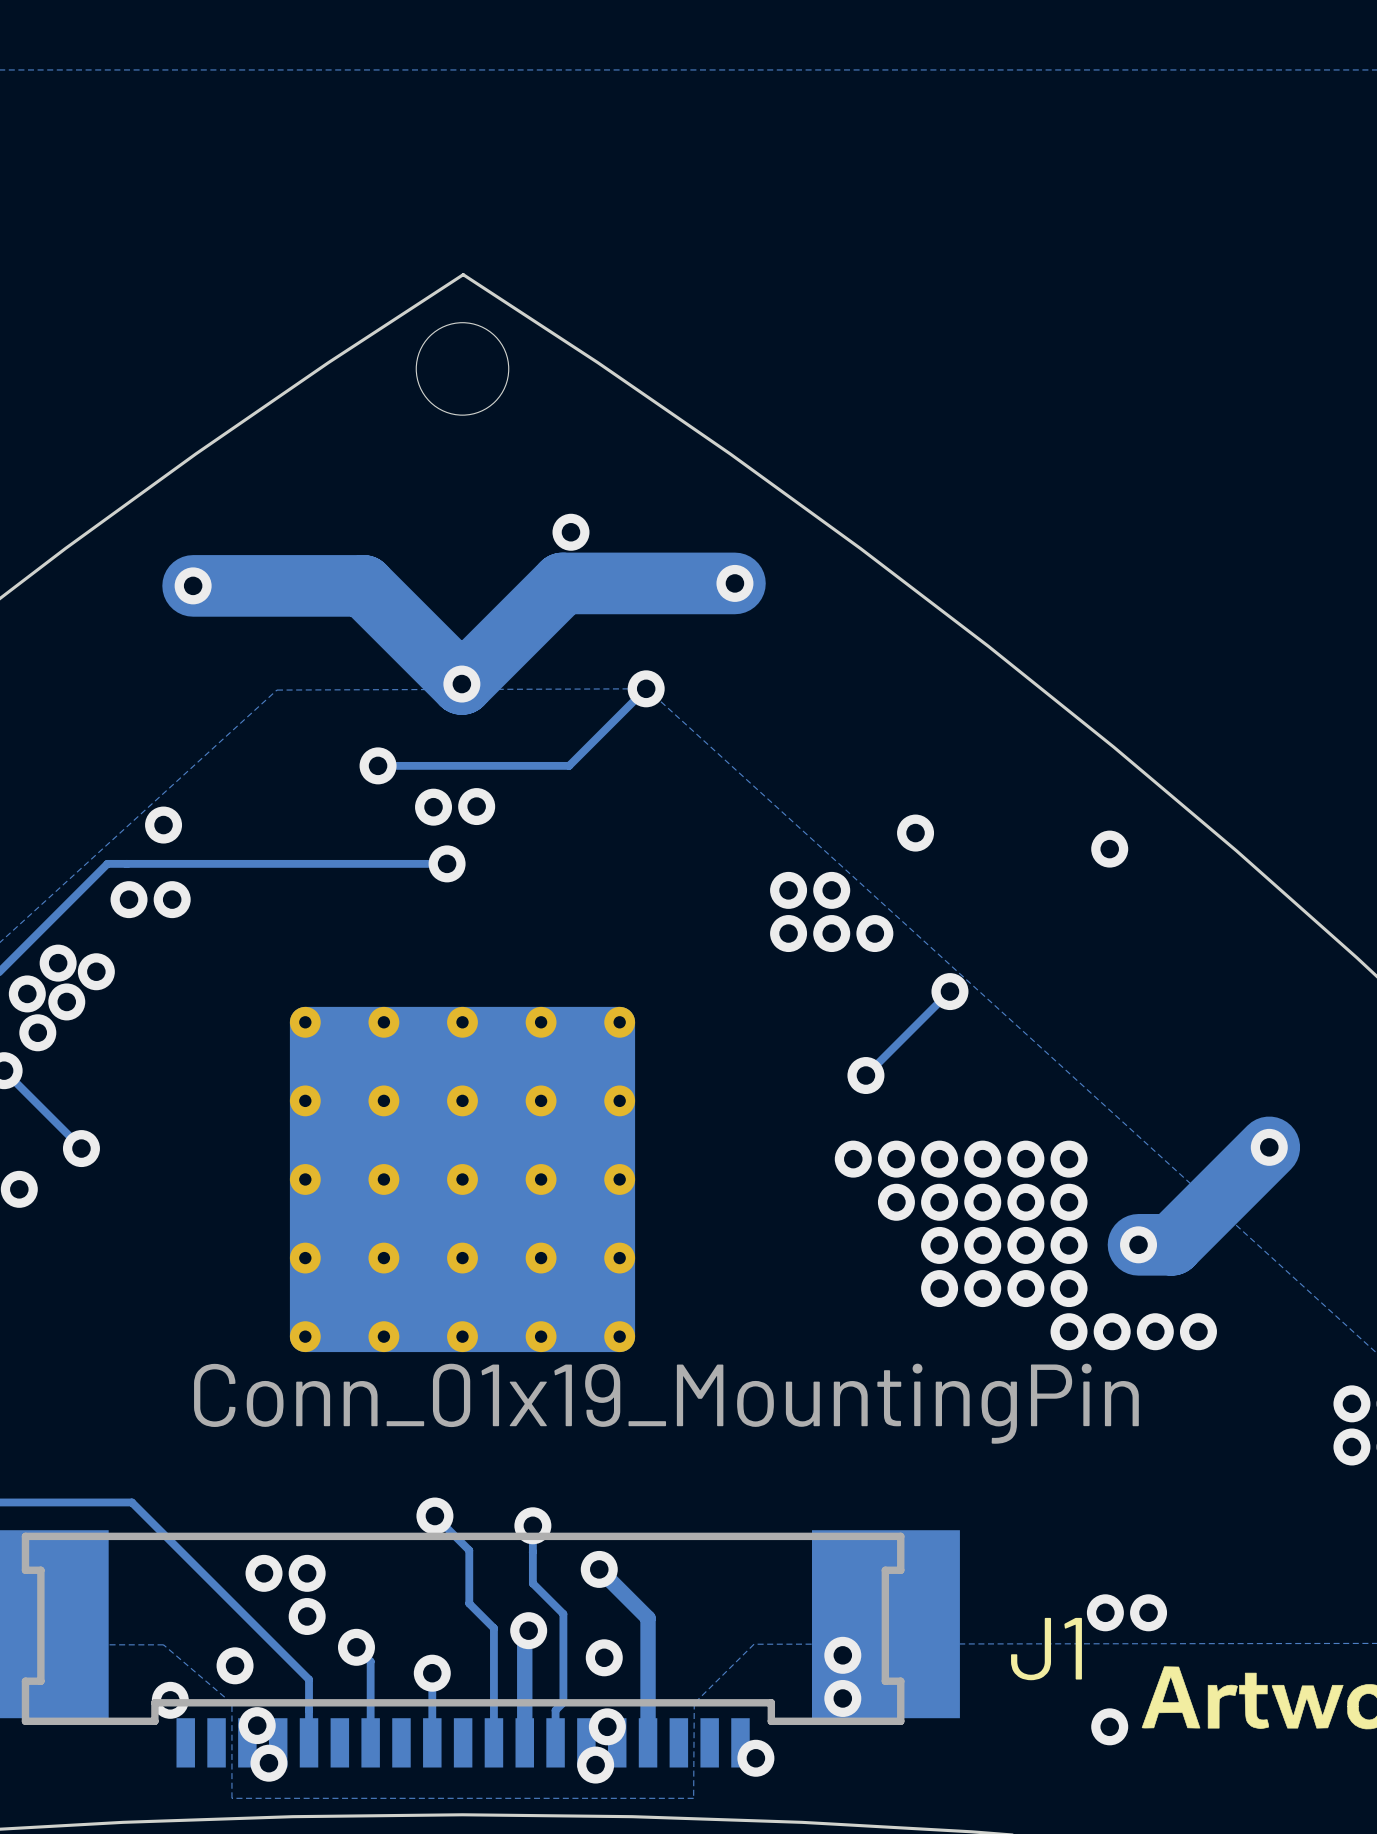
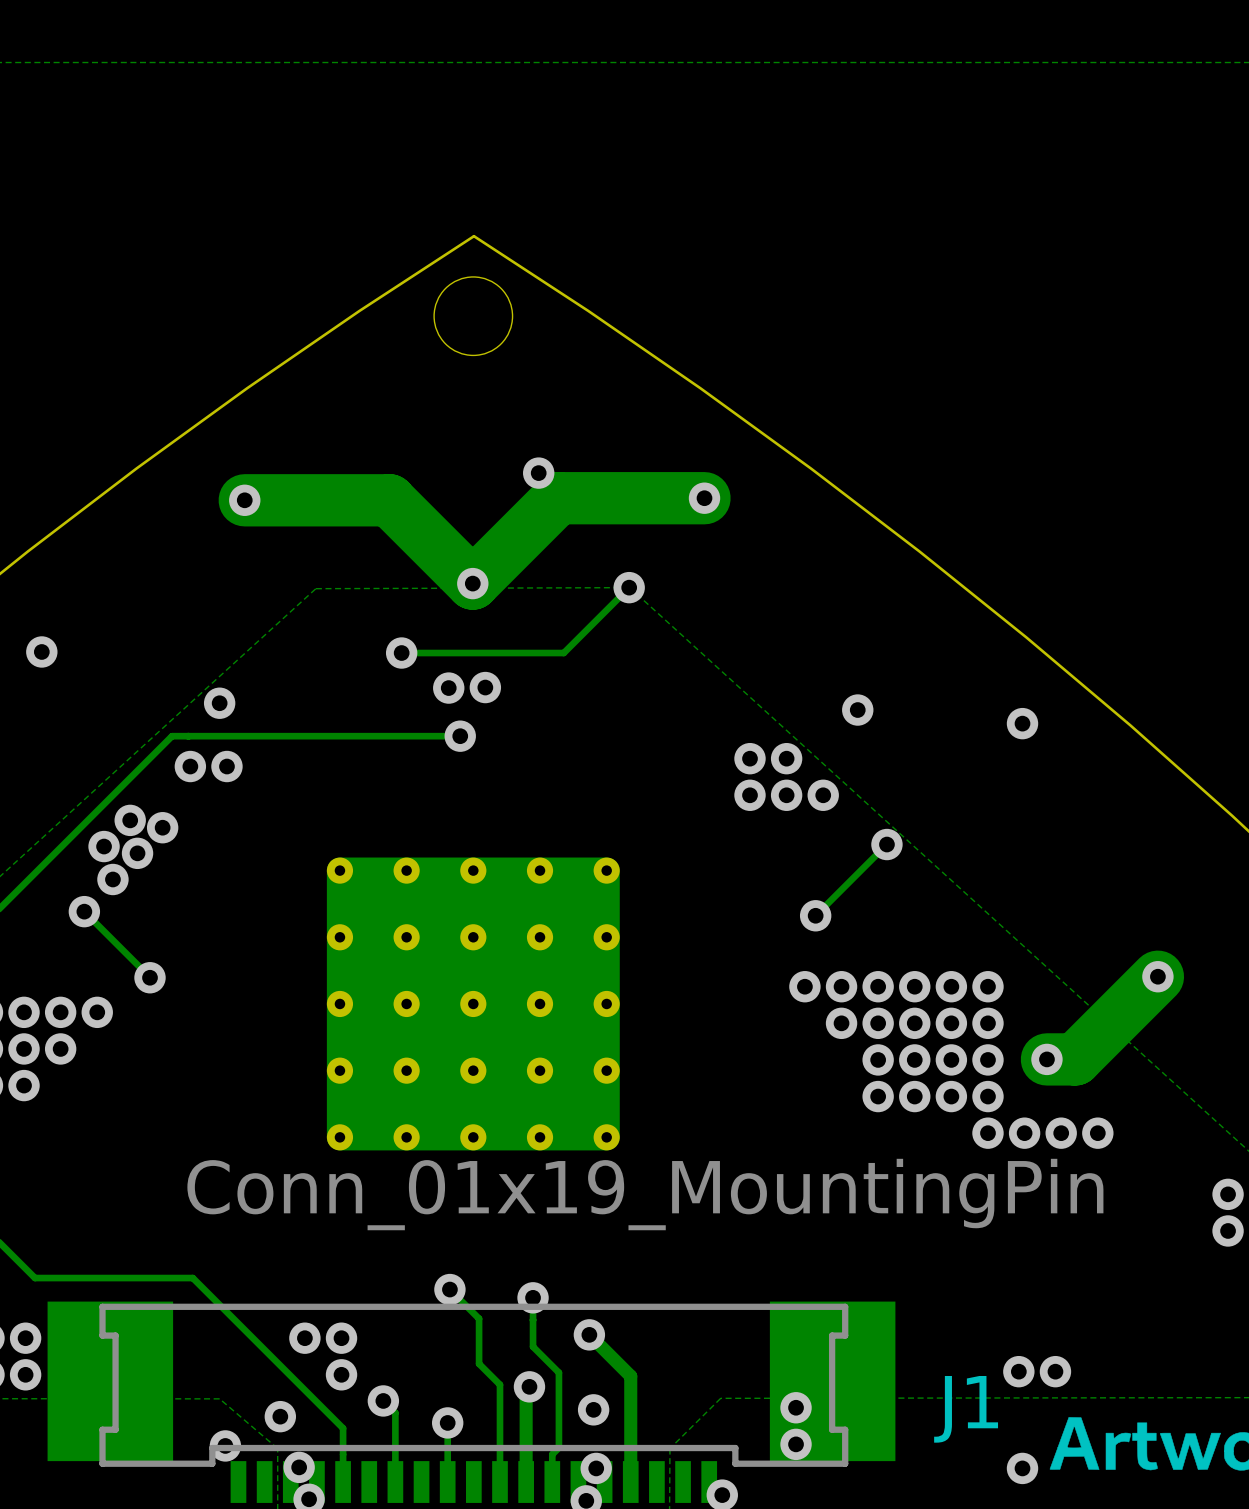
via position: (570, 532) -> (538, 473)

